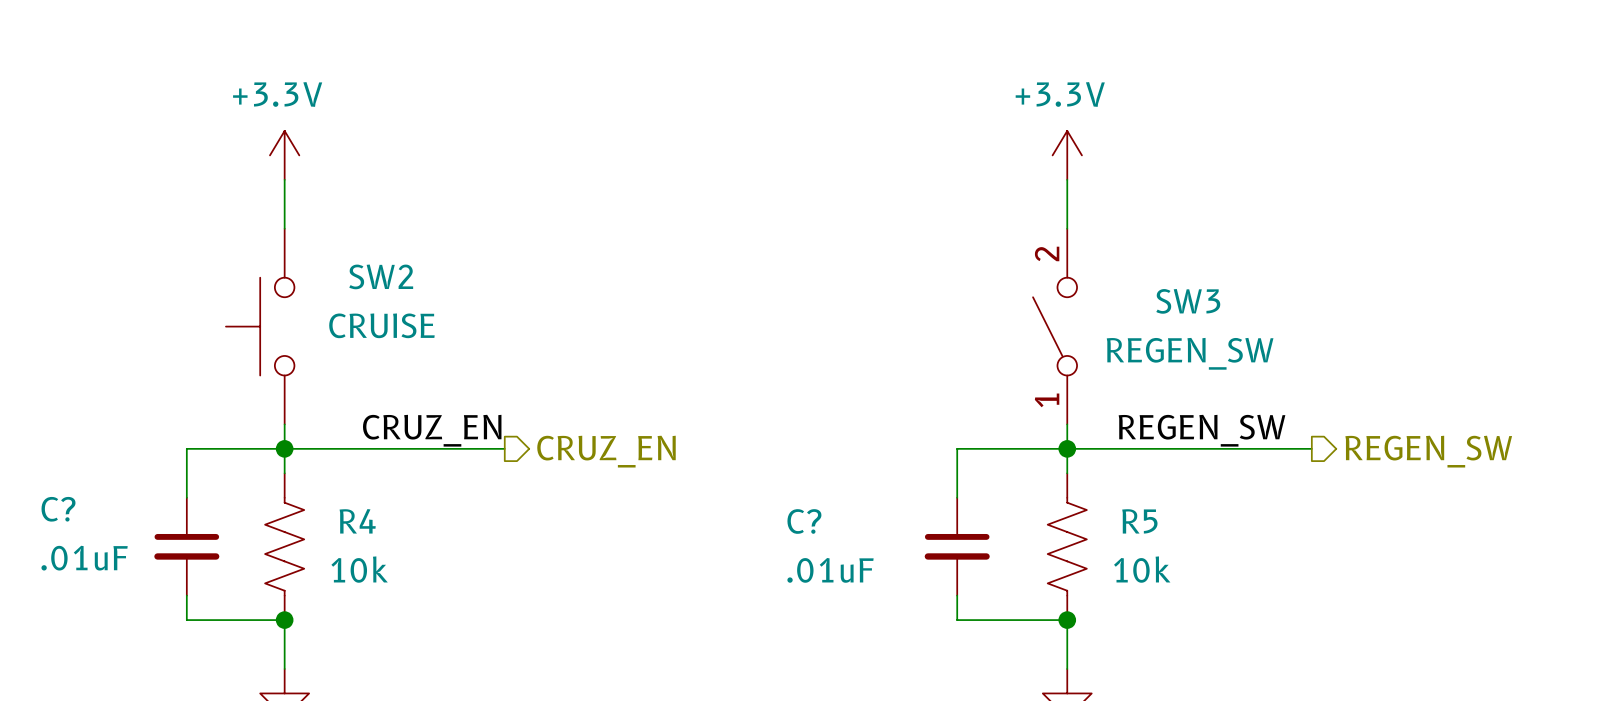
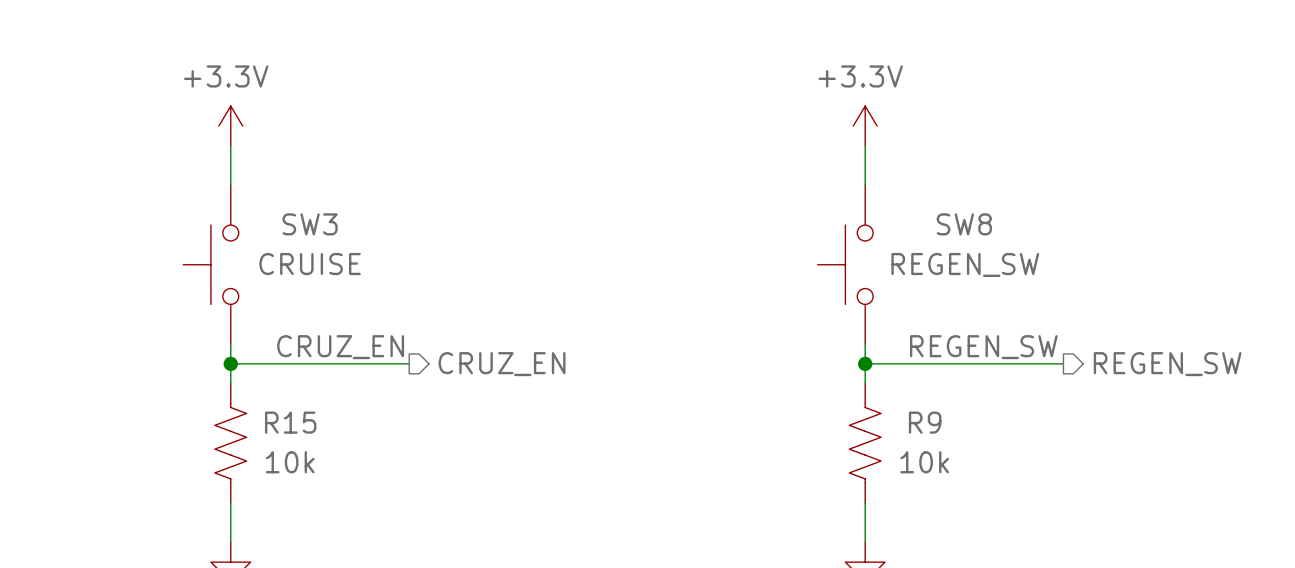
SW2 name: SW2 (381, 276) -> SW3 (310, 224)
SW8: none -> REGEN_SW (845, 264)
SW3: REGEN_SW (1055, 326) -> none
wire: (284, 448) (186, 448) (186, 497) -> none
wire: (1067, 448) (957, 448) (957, 497) -> none
R4 name: R4 (357, 521) -> R15 (290, 422)
R5 name: R5 (1139, 521) -> R9 (925, 422)
C?: .01uF (186, 546) -> none
C?: .01uF (957, 546) -> none
wire: (186, 595) (186, 620) (284, 620) -> none
wire: (957, 595) (957, 620) (1067, 620) -> none
junction: (284, 620) -> none
junction: (1067, 620) -> none

